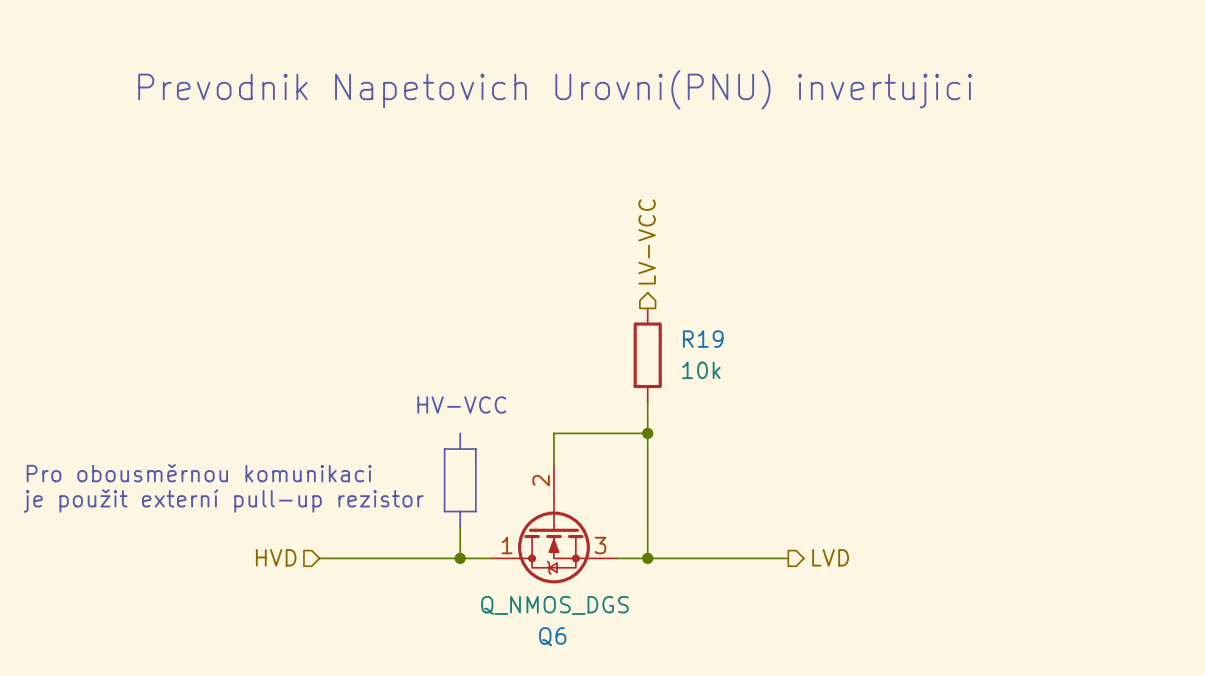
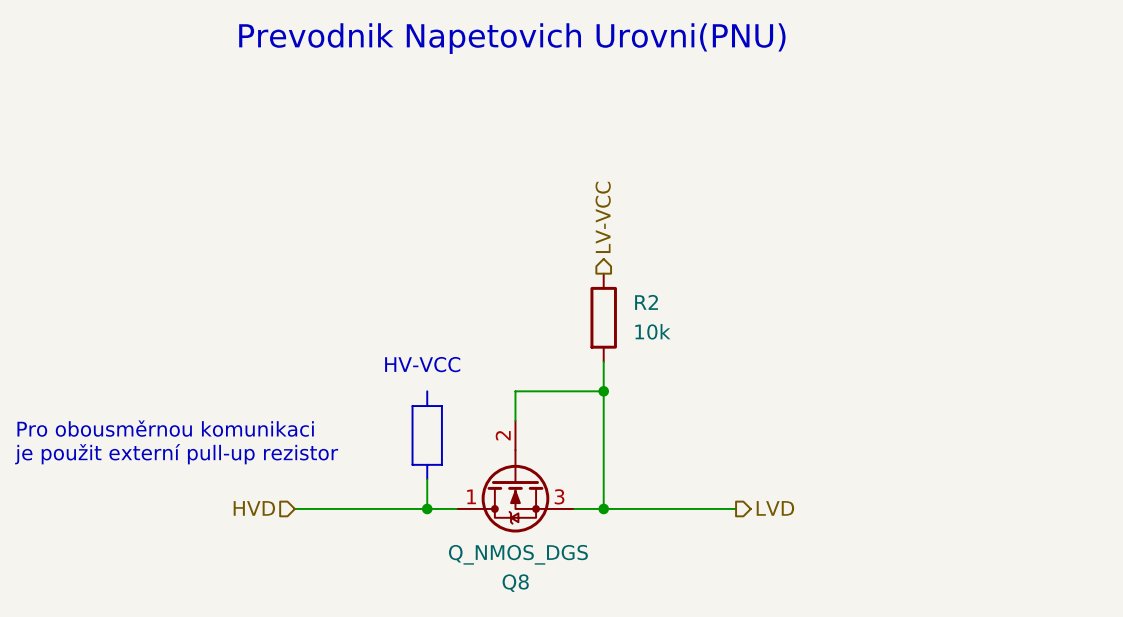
text: Prevodnik Napetovich Urovni(PNU) invertujici (555, 89) -> Prevodnik Napetovich Urovni(PNU) (512, 38)
R19 name: R19 (703, 339) -> R2 (646, 302)
Q6 name: Q6 (552, 636) -> Q8 (515, 583)

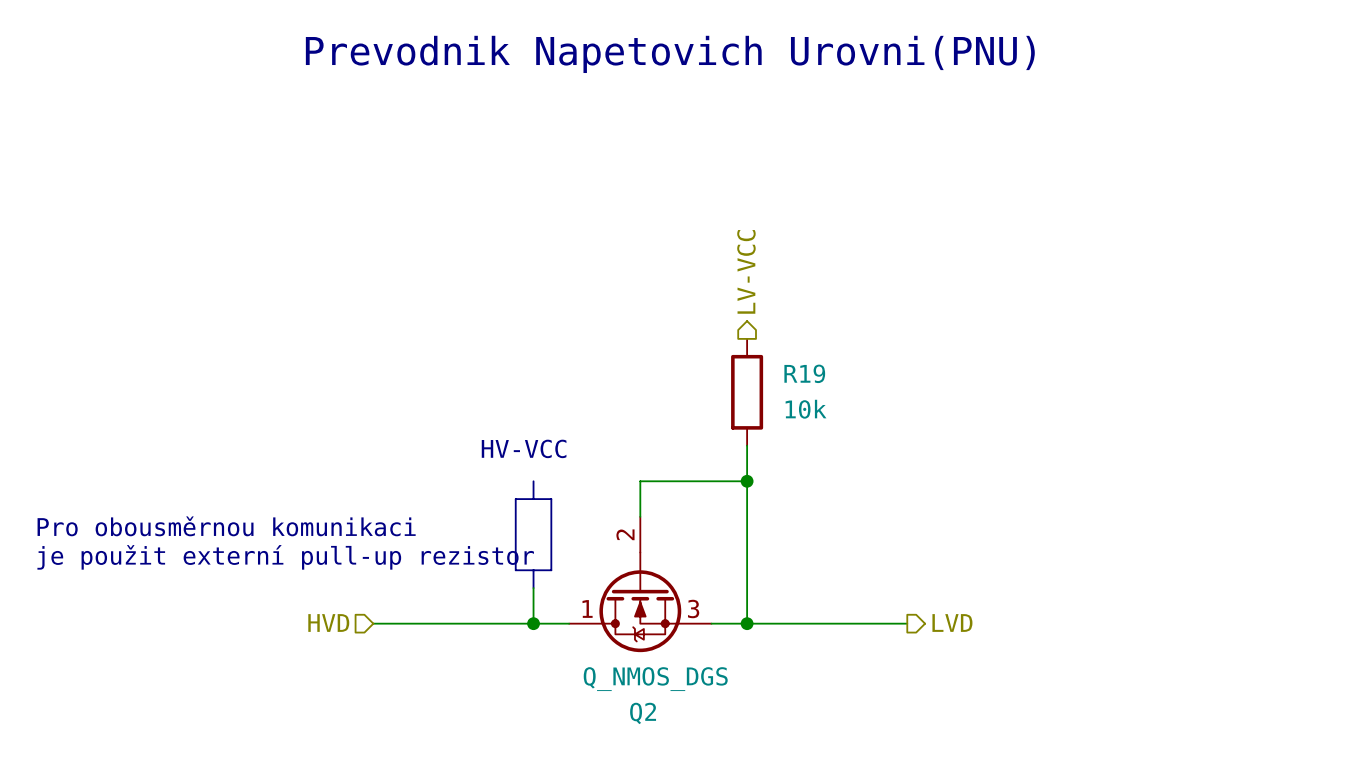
R2 name: R2 (646, 302) -> R19 (804, 373)
Q8 name: Q8 (515, 583) -> Q2 (643, 713)

